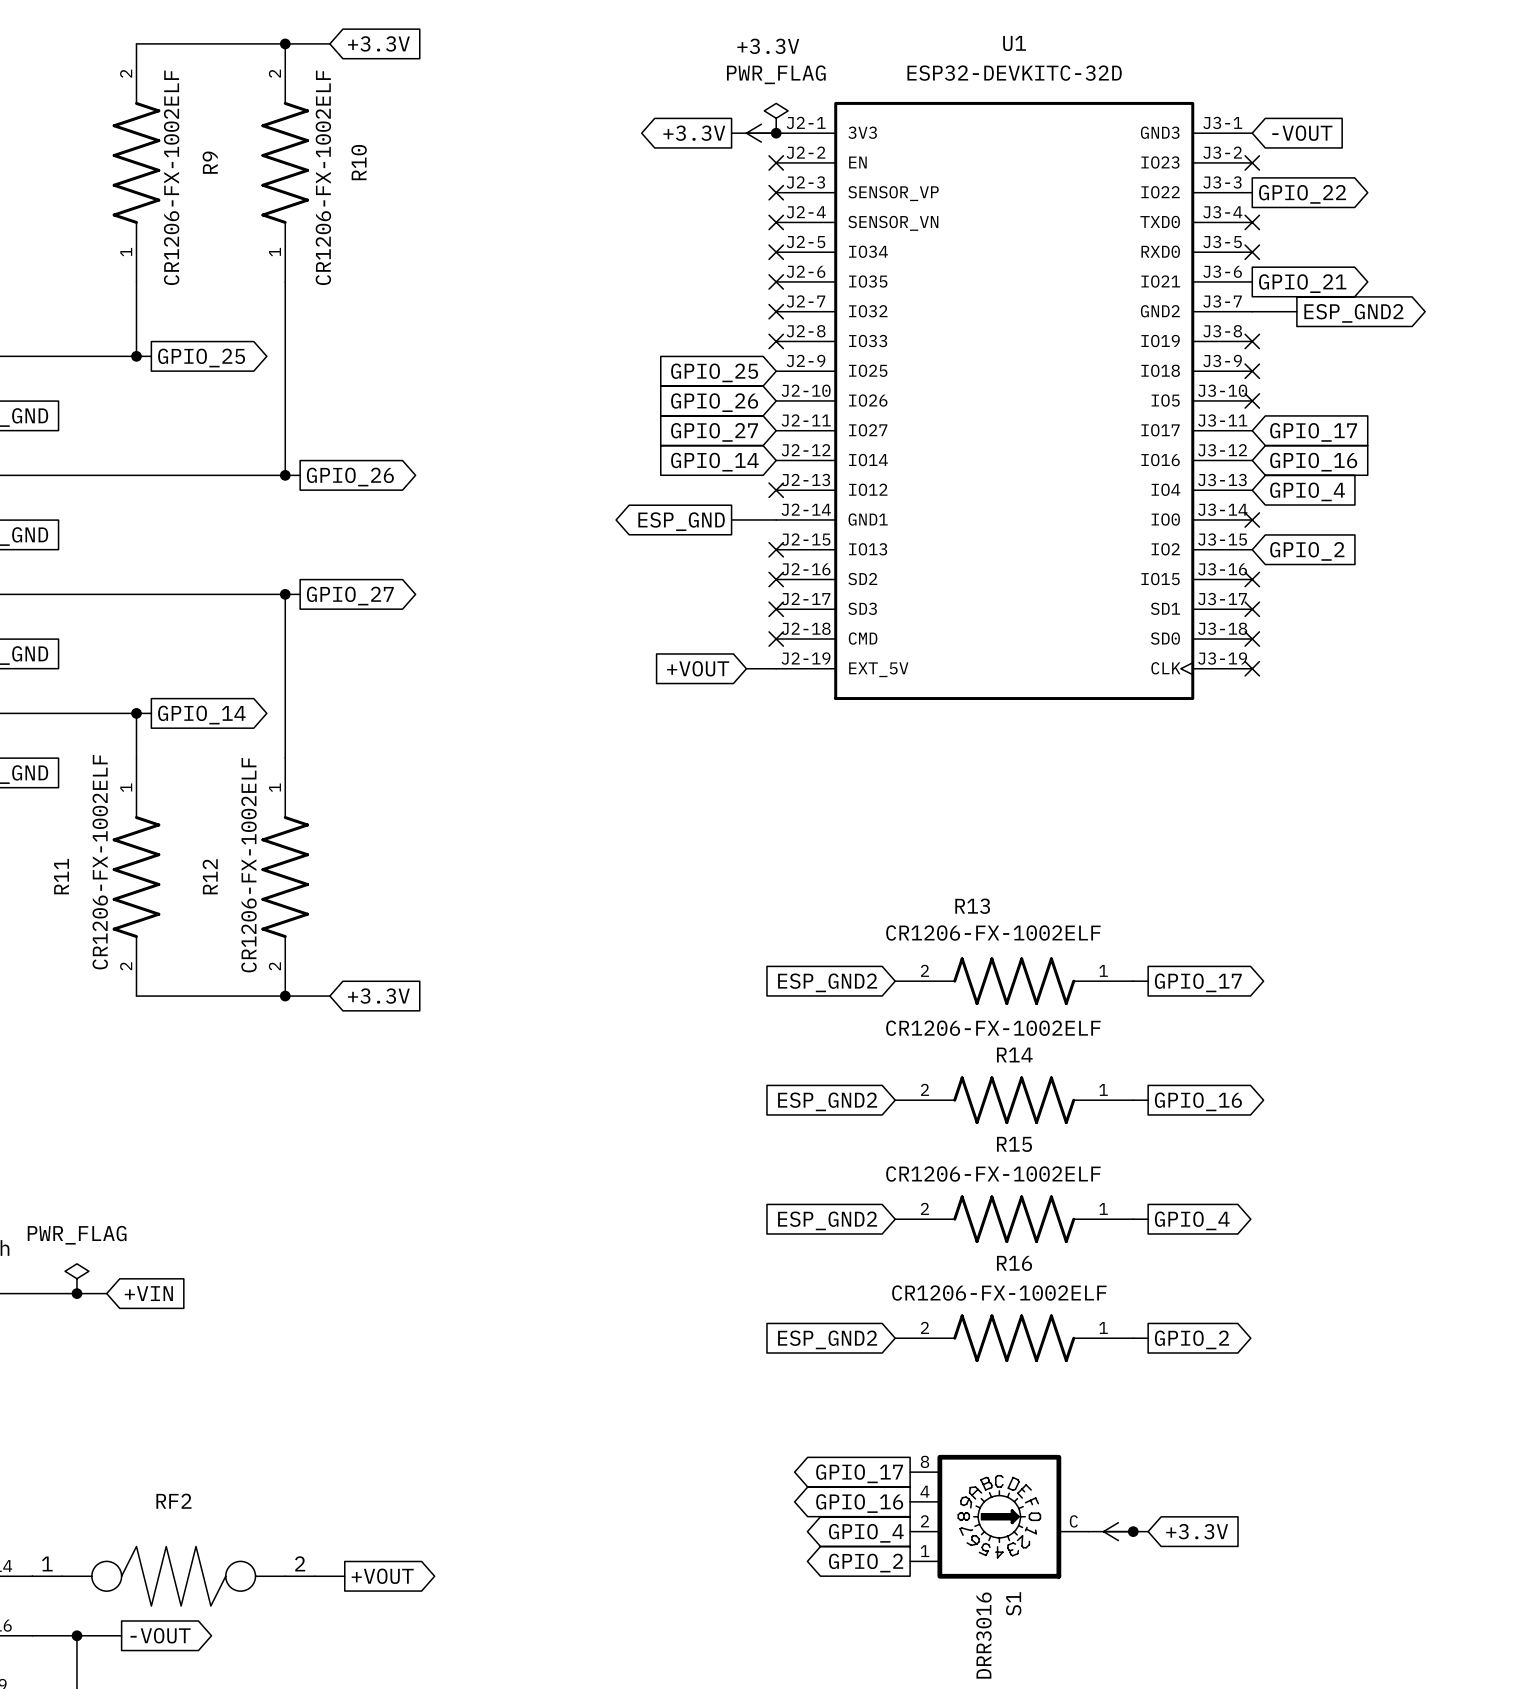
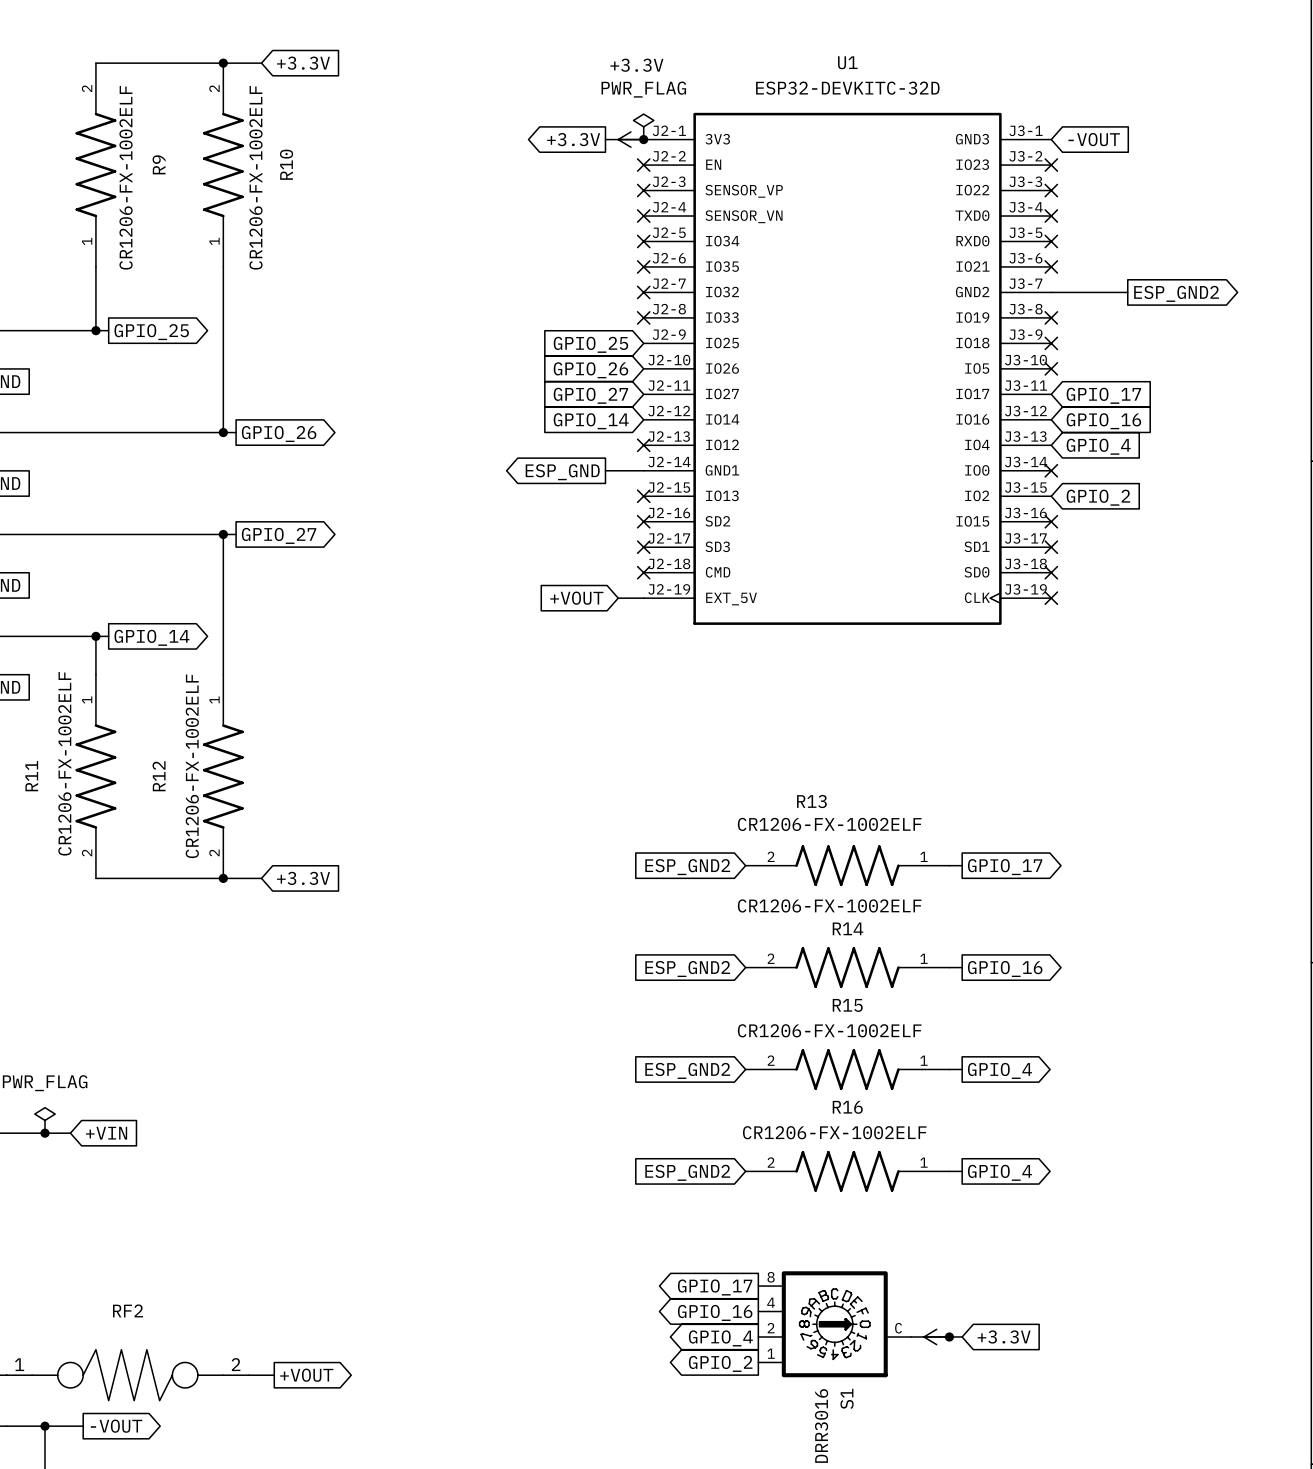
no-connect mark: none -> (1051, 190)
global label: GPIO_22 (1302, 194) -> none
no-connect mark: none -> (1051, 266)
global label: GPIO_21 (1302, 283) -> none
wire: none -> (1089, 292) (1127, 292)
global label position: ESP_GND2 (1353, 313) -> ESP_GND2 (1176, 293)
global label: GPIO_2 (1192, 1339) -> GPIO_4 (999, 1172)

